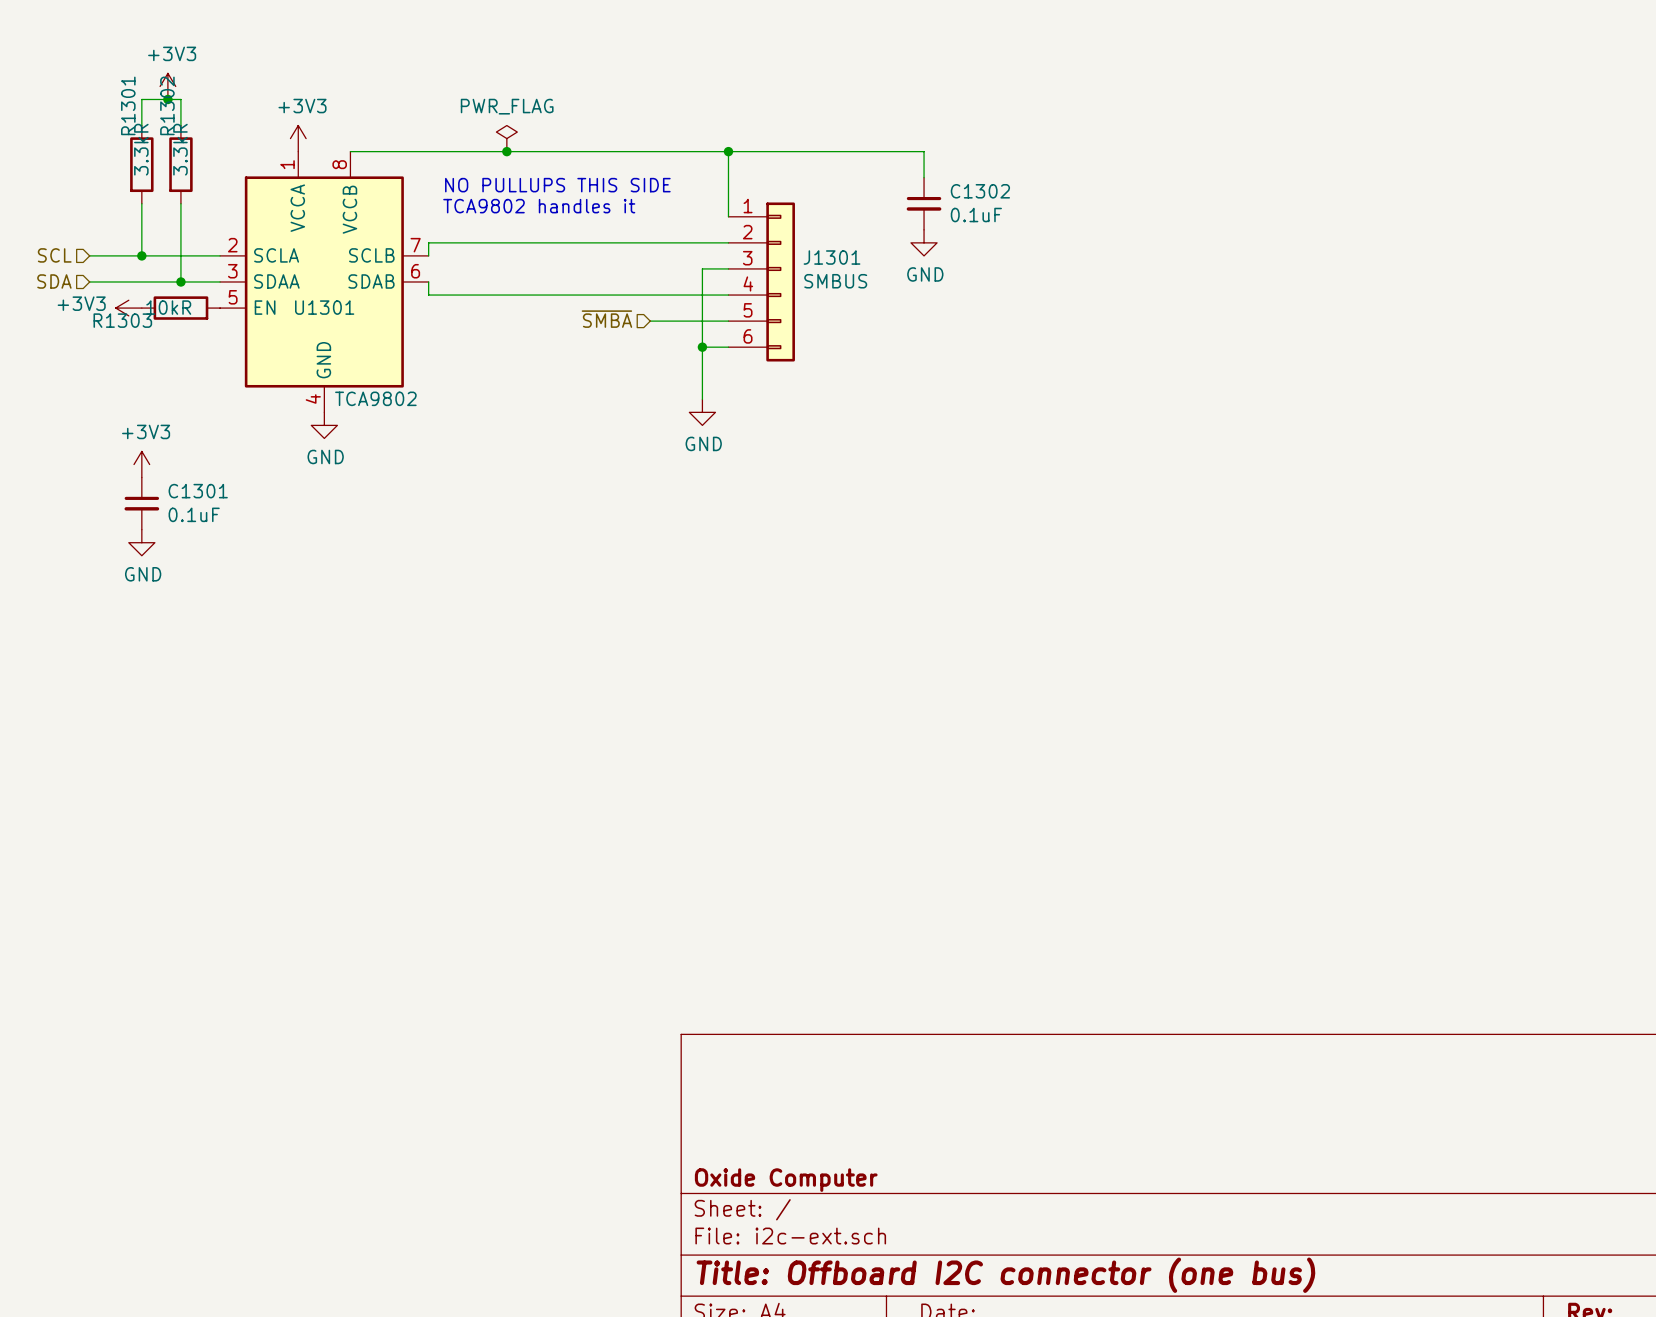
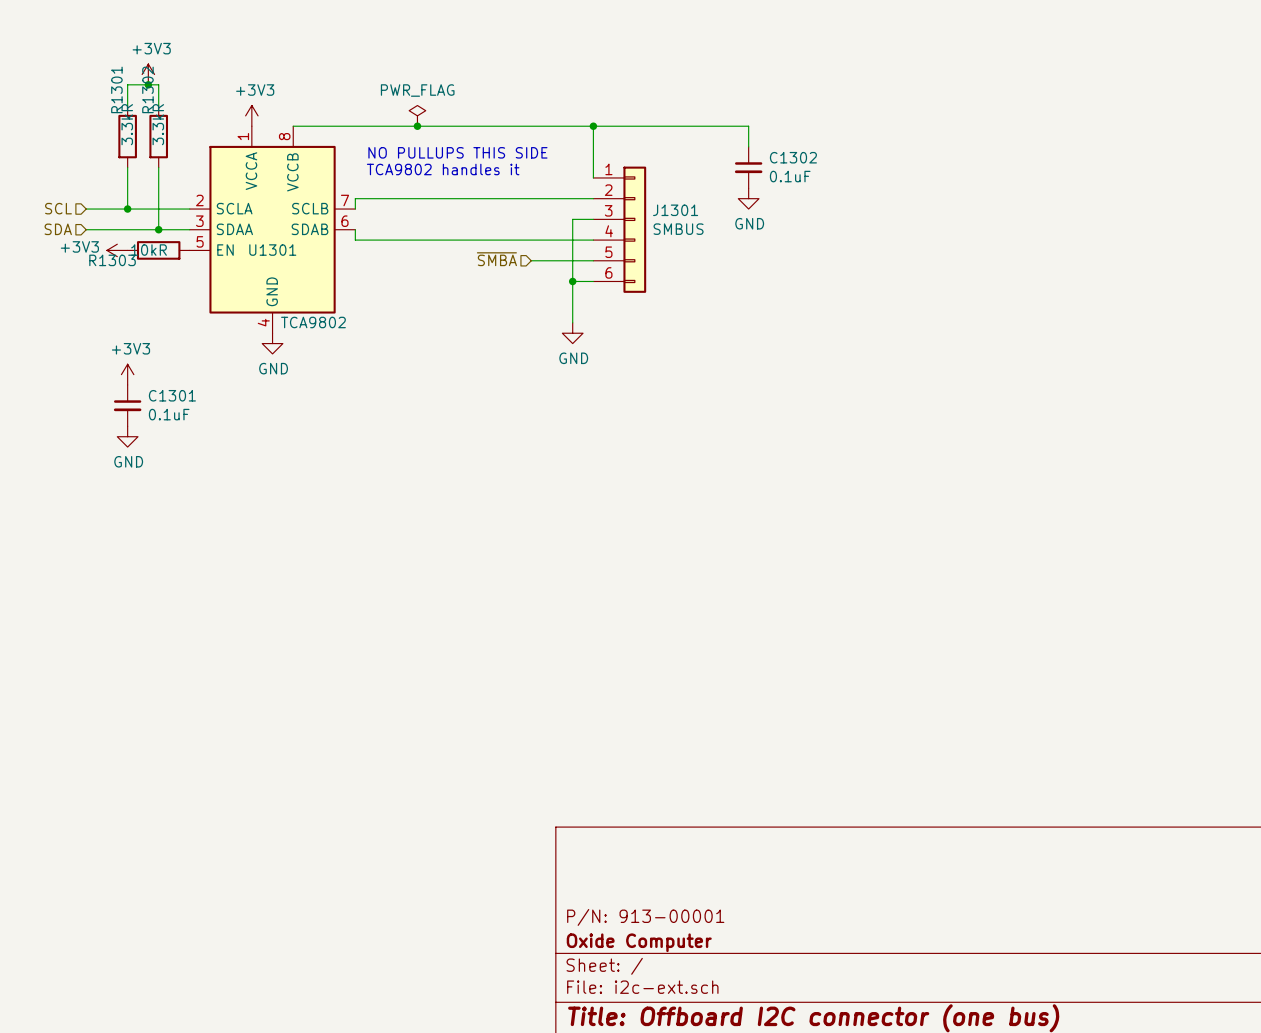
title block: none -> P/N: 913-00001 (645, 917)

